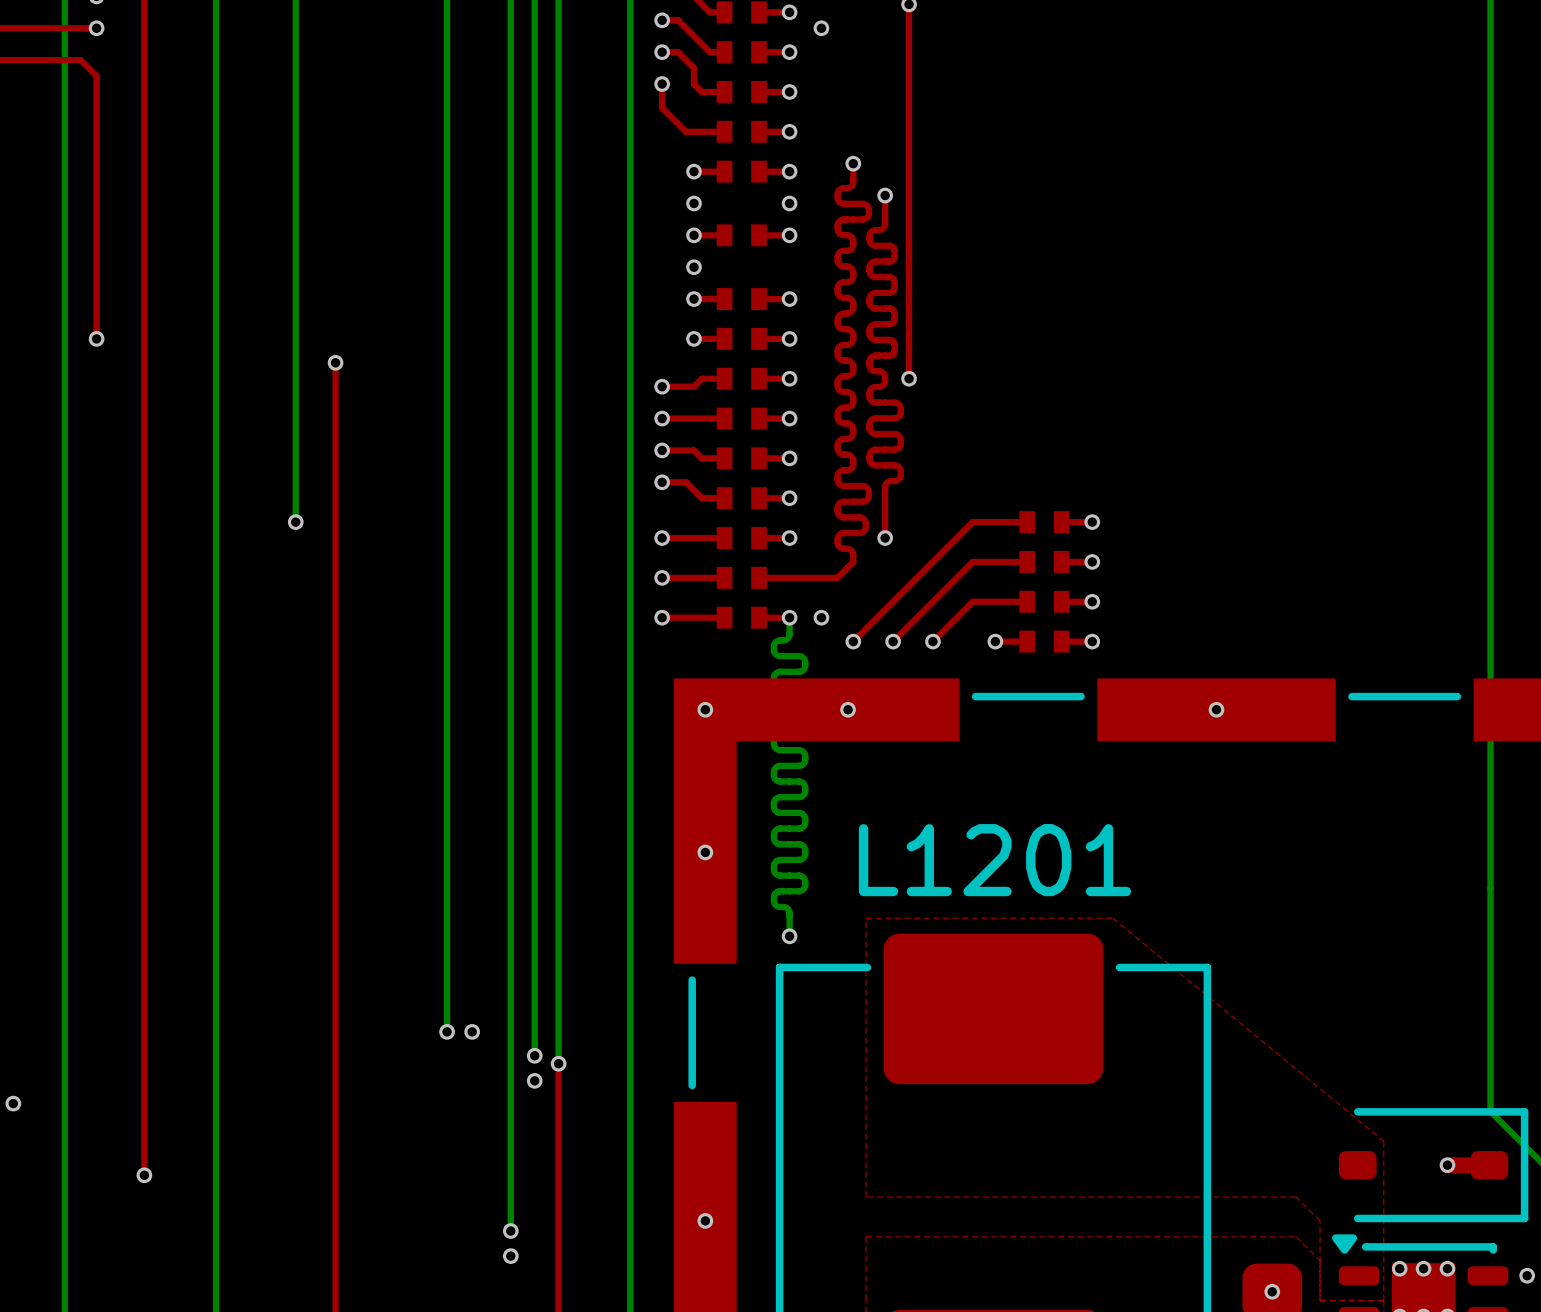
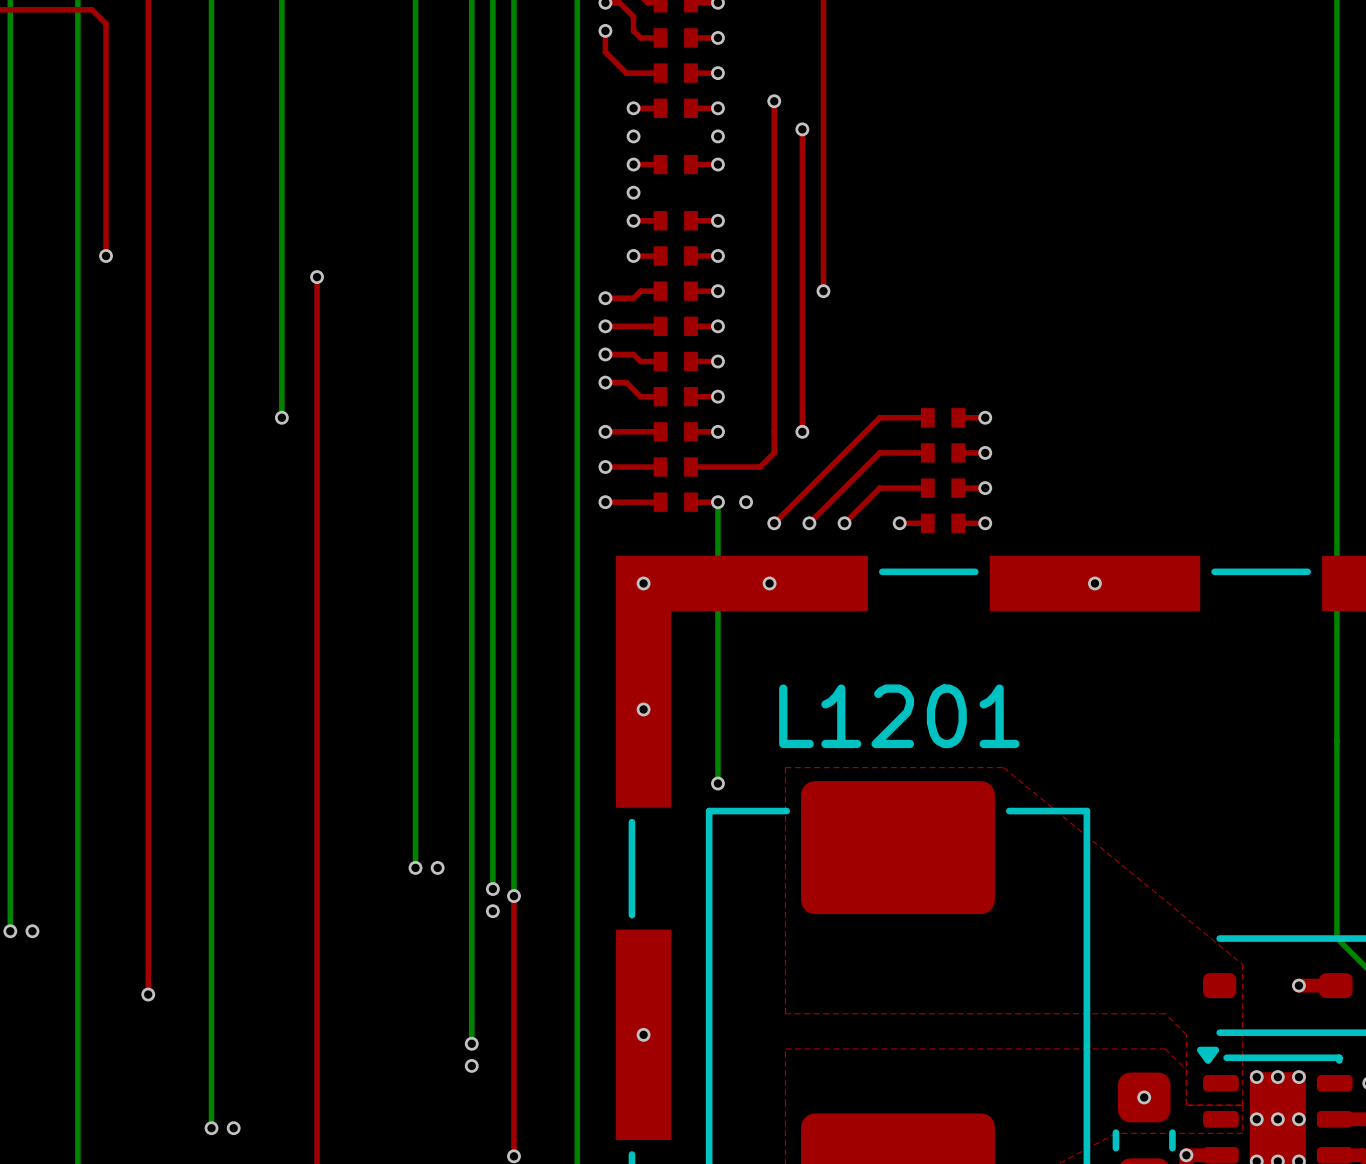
top track: (853, 181) (850, 187) (839, 189) (837, 194) (837, 199) (841, 203) (864, 203) (868, 207) (868, 215) (865, 218) (843, 219) (838, 223) (839, 232) (850, 236) (853, 241) -> (774, 117) (774, 169)
top track: (885, 223) (882, 229) (871, 231) (869, 236) (869, 241) (873, 245) (891, 245) (894, 249) (892, 260) (874, 261) (869, 267) (872, 276) (891, 277) (894, 281) (892, 291) (874, 293) (869, 298) (872, 307) (891, 308) (894, 312) (892, 323) (874, 324) (869, 329) (869, 335) (873, 339) (890, 339) (894, 343) (892, 354) (874, 355) (869, 360) (871, 369) (882, 372) (885, 377) -> (802, 154) (802, 290)
top track: (853, 244) (850, 249) (839, 252) (837, 257) (839, 264) (850, 267) (853, 272) -> (774, 172) (774, 197)
top track: (853, 275) (850, 281) (839, 283) (837, 288) (839, 296) (850, 298) (853, 304) -> (774, 200) (774, 225)
top track: (853, 307) (850, 312) (839, 314) (837, 319) (839, 327) (850, 330) (853, 335) -> (774, 228) (774, 252)
top track: (853, 338) (850, 343) (839, 346) (837, 351) (839, 358) (850, 361) (853, 366) -> (774, 255) (774, 280)
top track: (853, 370) (850, 375) (839, 377) (837, 382) (839, 390) (850, 392) (853, 398) -> (774, 283) (774, 308)
top track: (885, 380) (882, 385) (872, 387) (869, 393) (869, 398) (873, 401) (895, 402) (900, 408) (900, 414) (897, 417) (874, 418) (869, 423) (869, 429) (873, 433) (895, 434) (900, 438) (900, 445) (897, 449) (874, 449) (869, 453) (869, 461) (873, 464) (895, 465) (900, 468) (899, 478) (888, 481) (885, 487) -> (802, 292) (802, 387)
top track: (853, 401) (850, 406) (839, 408) (837, 413) (839, 421) (850, 424) (853, 429) -> (774, 311) (774, 336)
top track: (853, 432) (850, 437) (840, 439) (837, 445) (839, 452) (850, 455) (853, 460) -> (774, 338) (774, 363)
top track: (853, 464) (850, 468) (840, 471) (837, 476) (837, 481) (841, 485) (864, 486) (868, 490) (868, 497) (865, 501) (842, 501) (837, 506) (837, 513) (841, 516) (860, 517) (865, 521) (865, 528) (862, 532) (842, 533) (837, 537) (839, 546) (850, 549) (853, 555) -> (774, 366) (774, 446)
bottom track: (789, 634) (786, 639) (776, 641) (773, 646) (774, 651) (777, 655) (800, 656) (805, 661) (804, 667) (801, 671) (778, 671) (773, 677) (774, 683) (777, 686) (800, 687) (805, 693) (804, 698) (801, 702) (778, 703) (773, 708) (774, 714) (777, 718) (800, 718) (805, 724) (804, 730) (801, 733) (778, 734) (773, 740) (774, 745) (777, 749) (800, 750) (805, 755) (804, 761) (801, 765) (778, 766) (773, 771) (774, 777) (777, 780) (800, 781) (805, 787) (804, 793) (801, 796) (778, 797) (773, 802) (774, 808) (777, 812) (800, 813) (805, 818) (804, 824) (801, 827) (778, 828) (773, 834) (774, 840) (777, 843) (800, 844) (805, 849) (804, 855) (801, 859) (778, 860) (774, 864) (774, 871) (777, 874) (800, 875) (804, 879) (804, 887) (801, 890) (779, 891) (774, 894) (775, 904) (786, 907) (789, 913) -> (717, 516) (717, 763)

